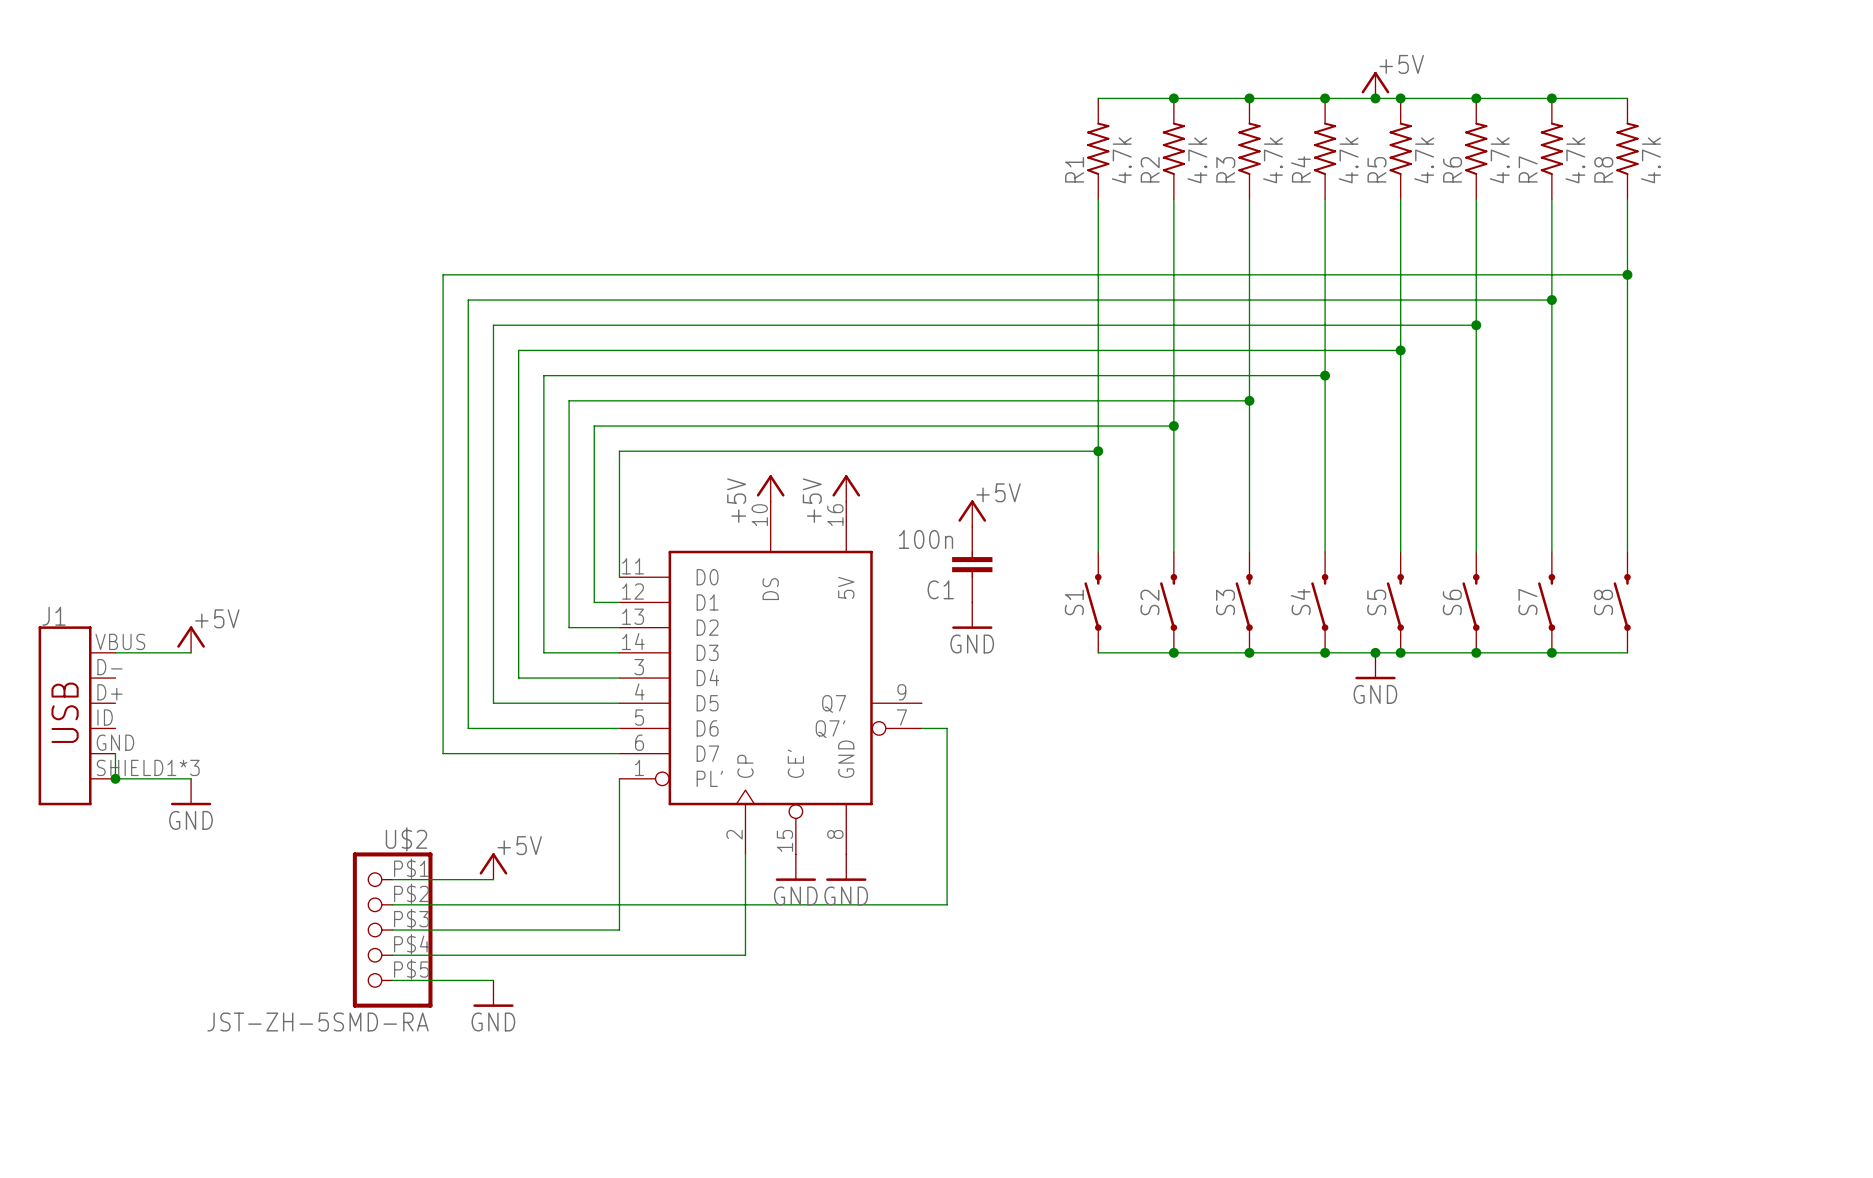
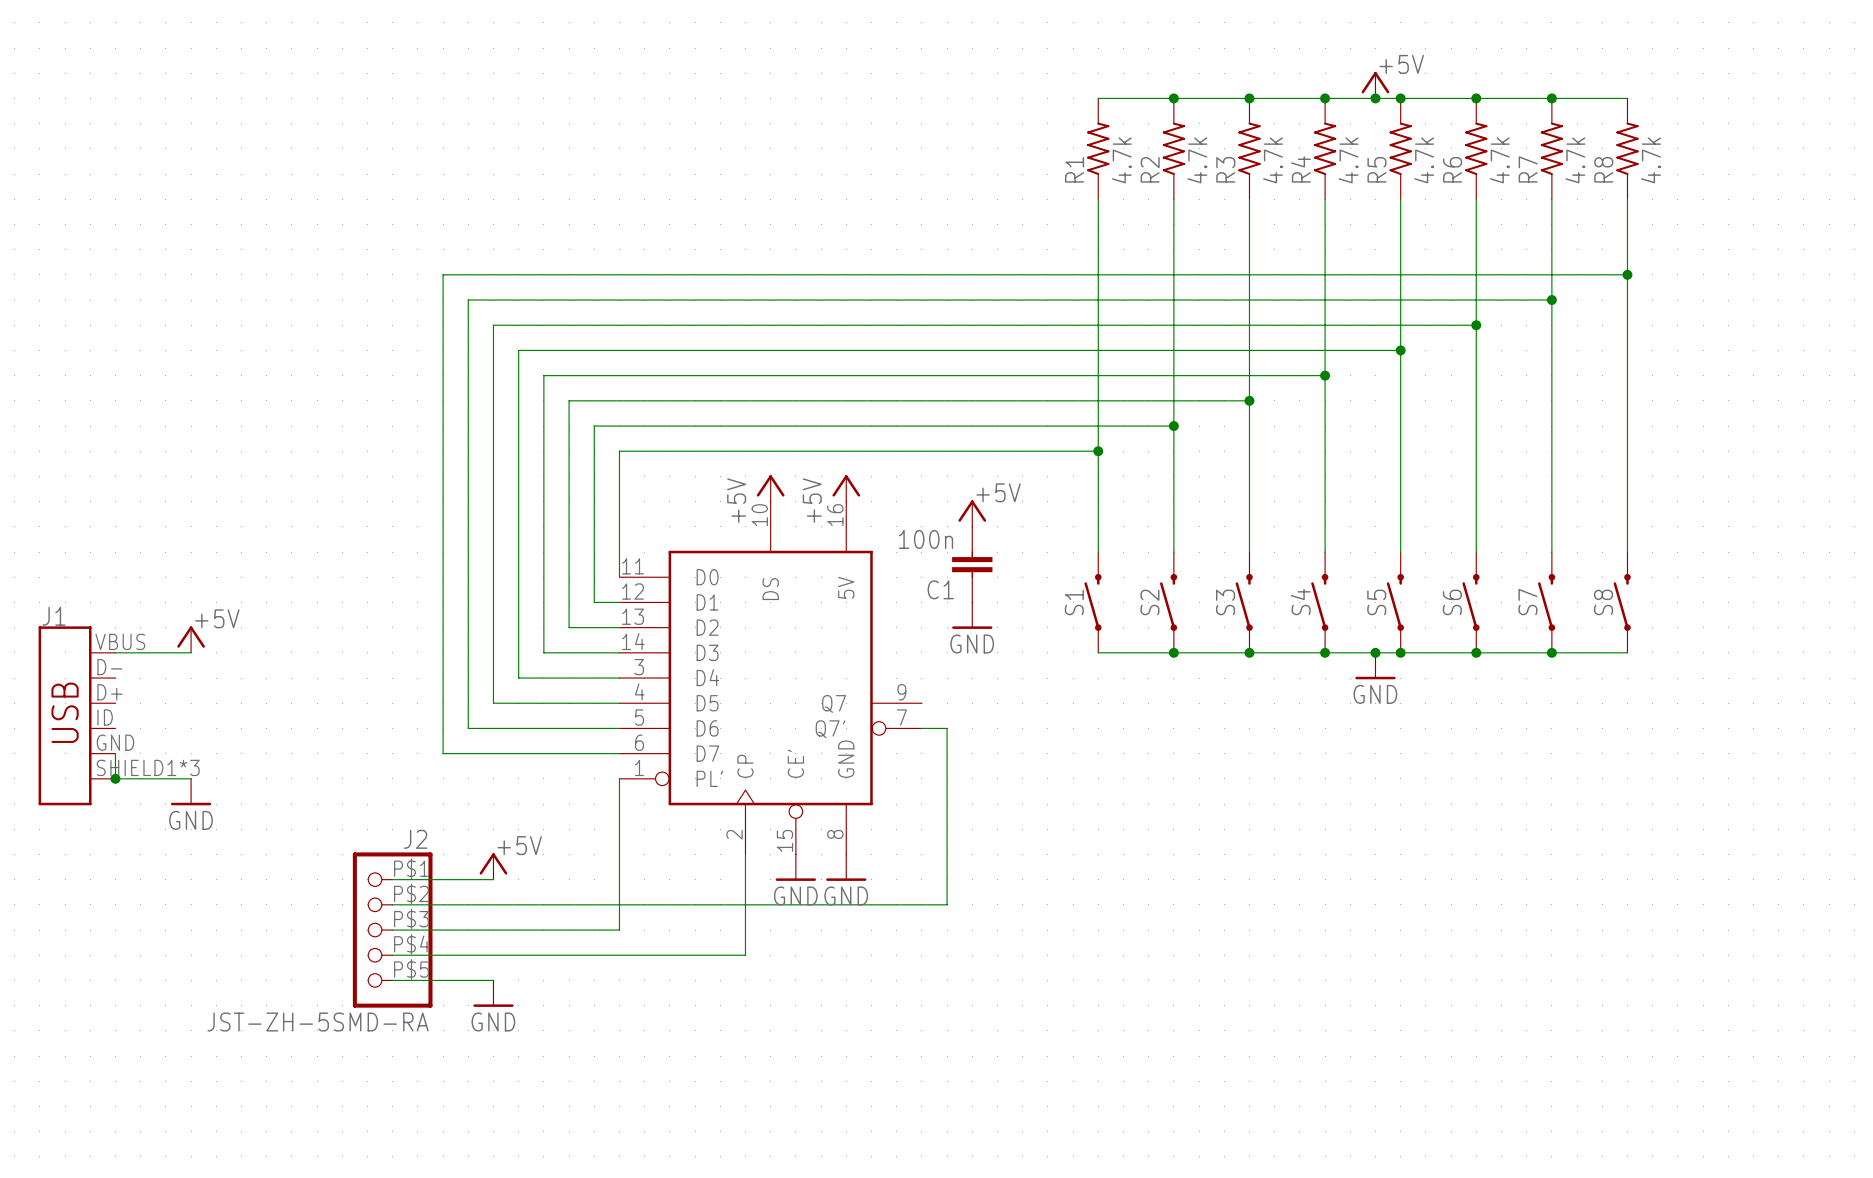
U$2 name: U$2 (406, 839) -> J2 (415, 839)

